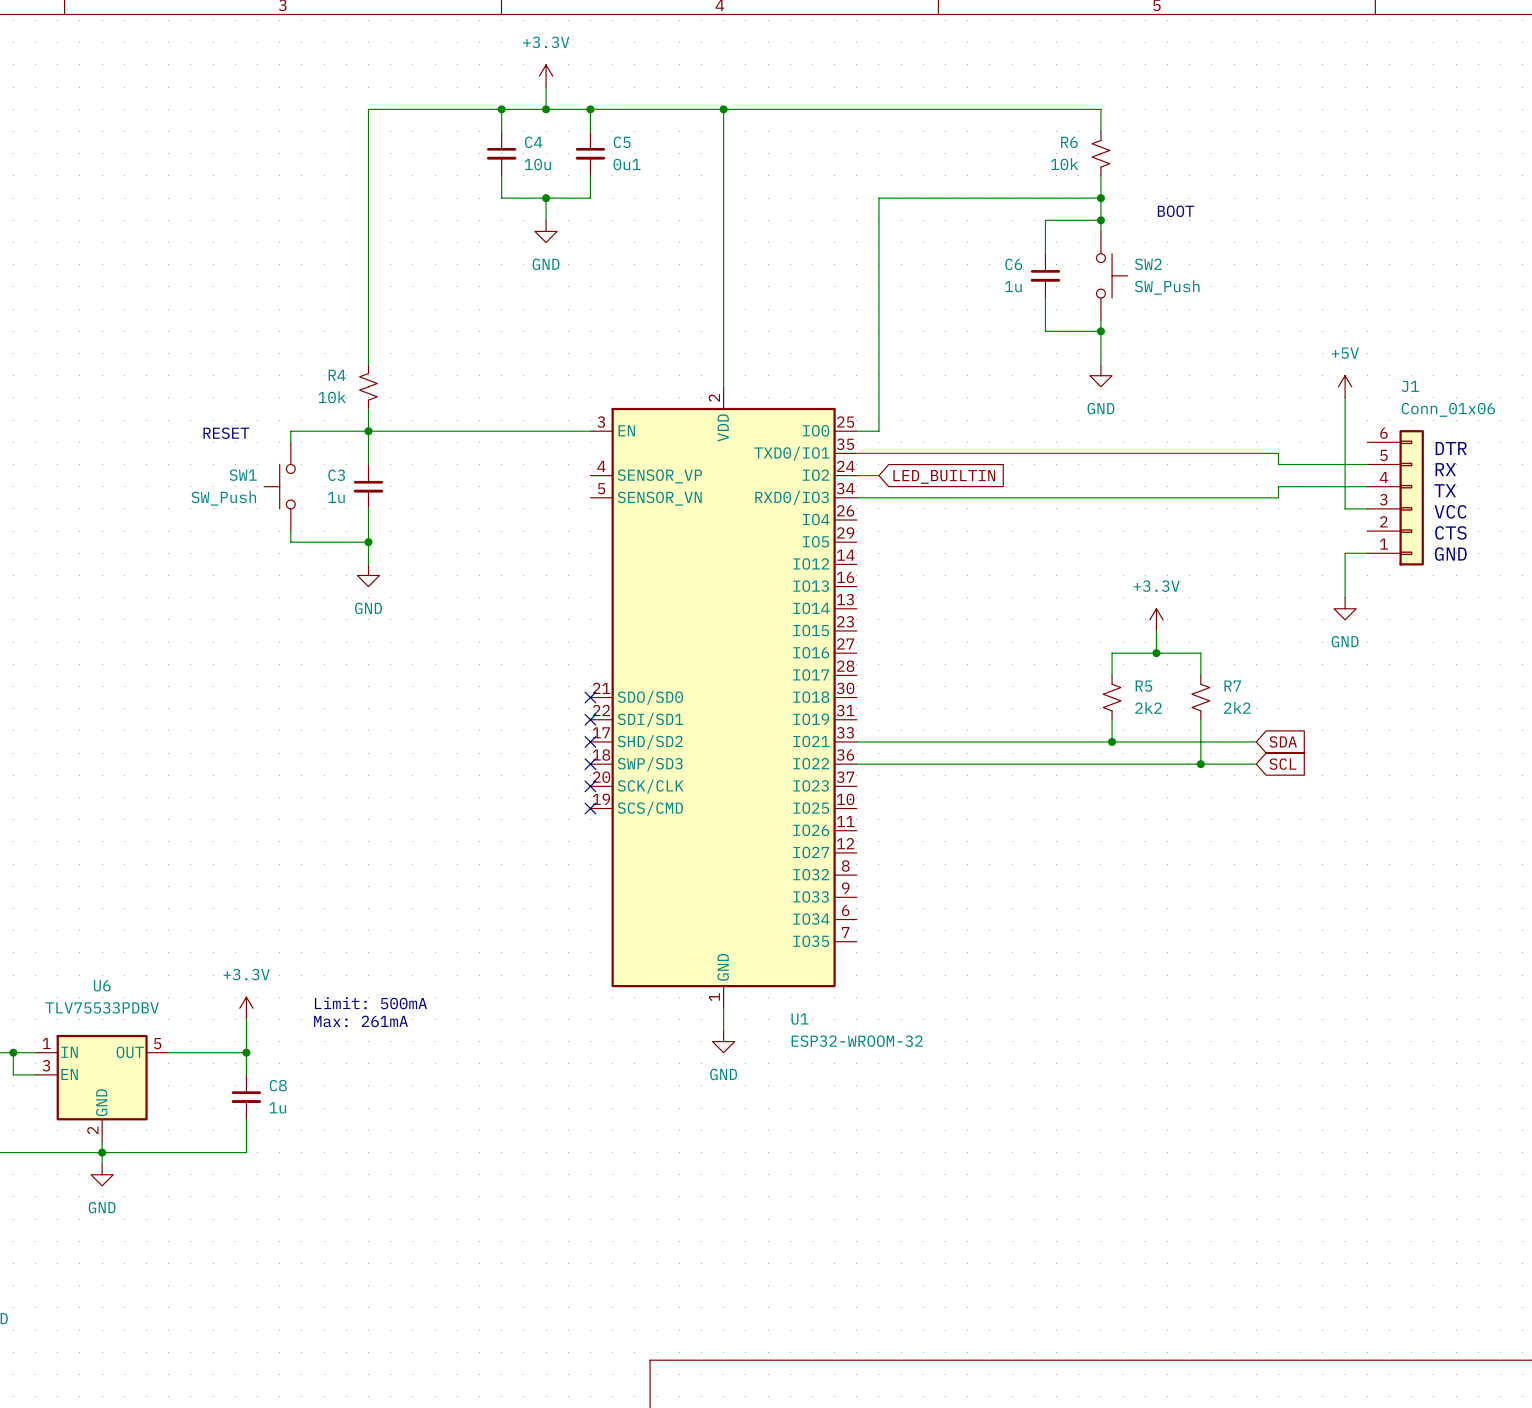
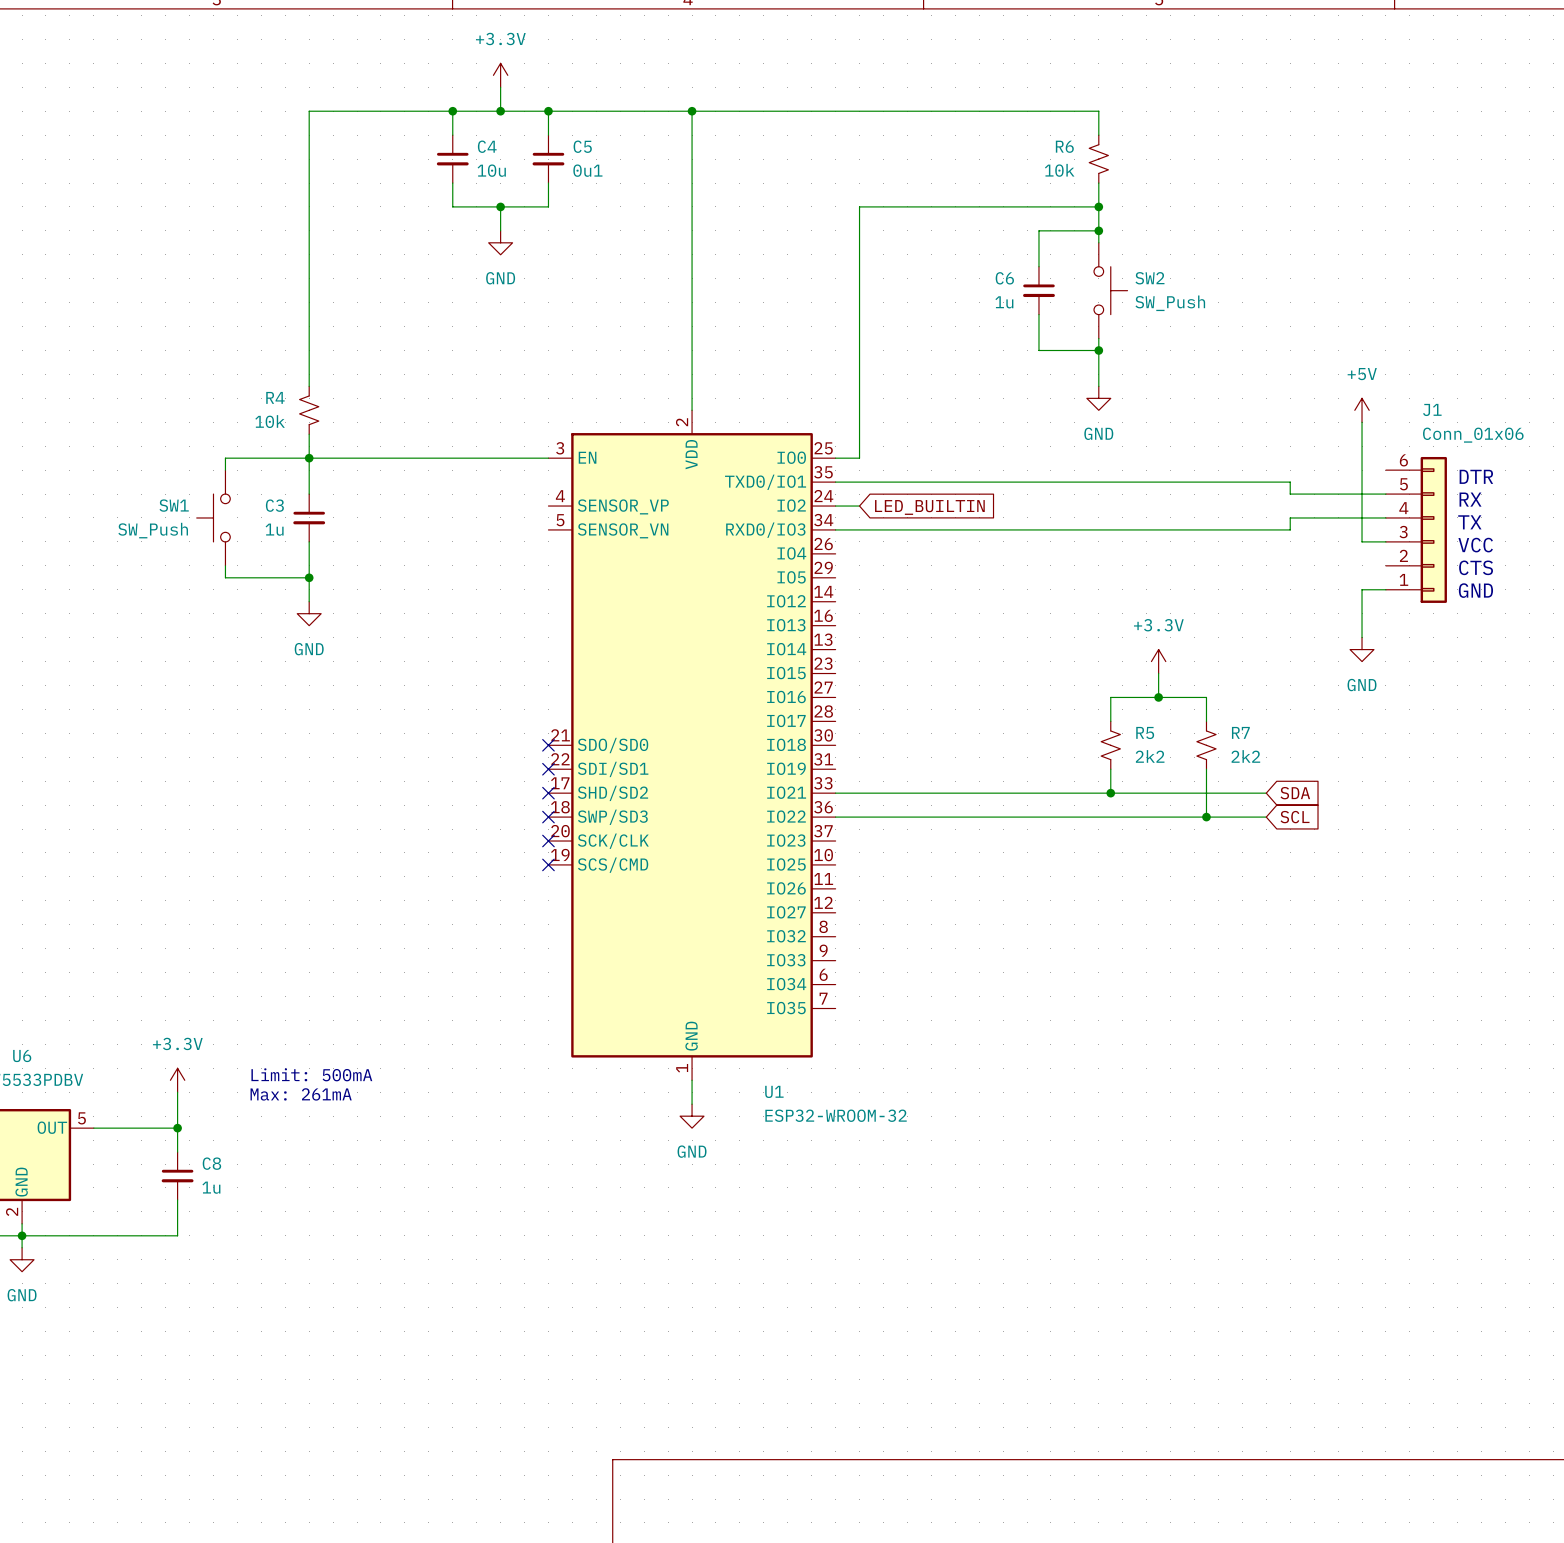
text: BOOT (1176, 211) -> none
text: RESET (226, 433) -> none

